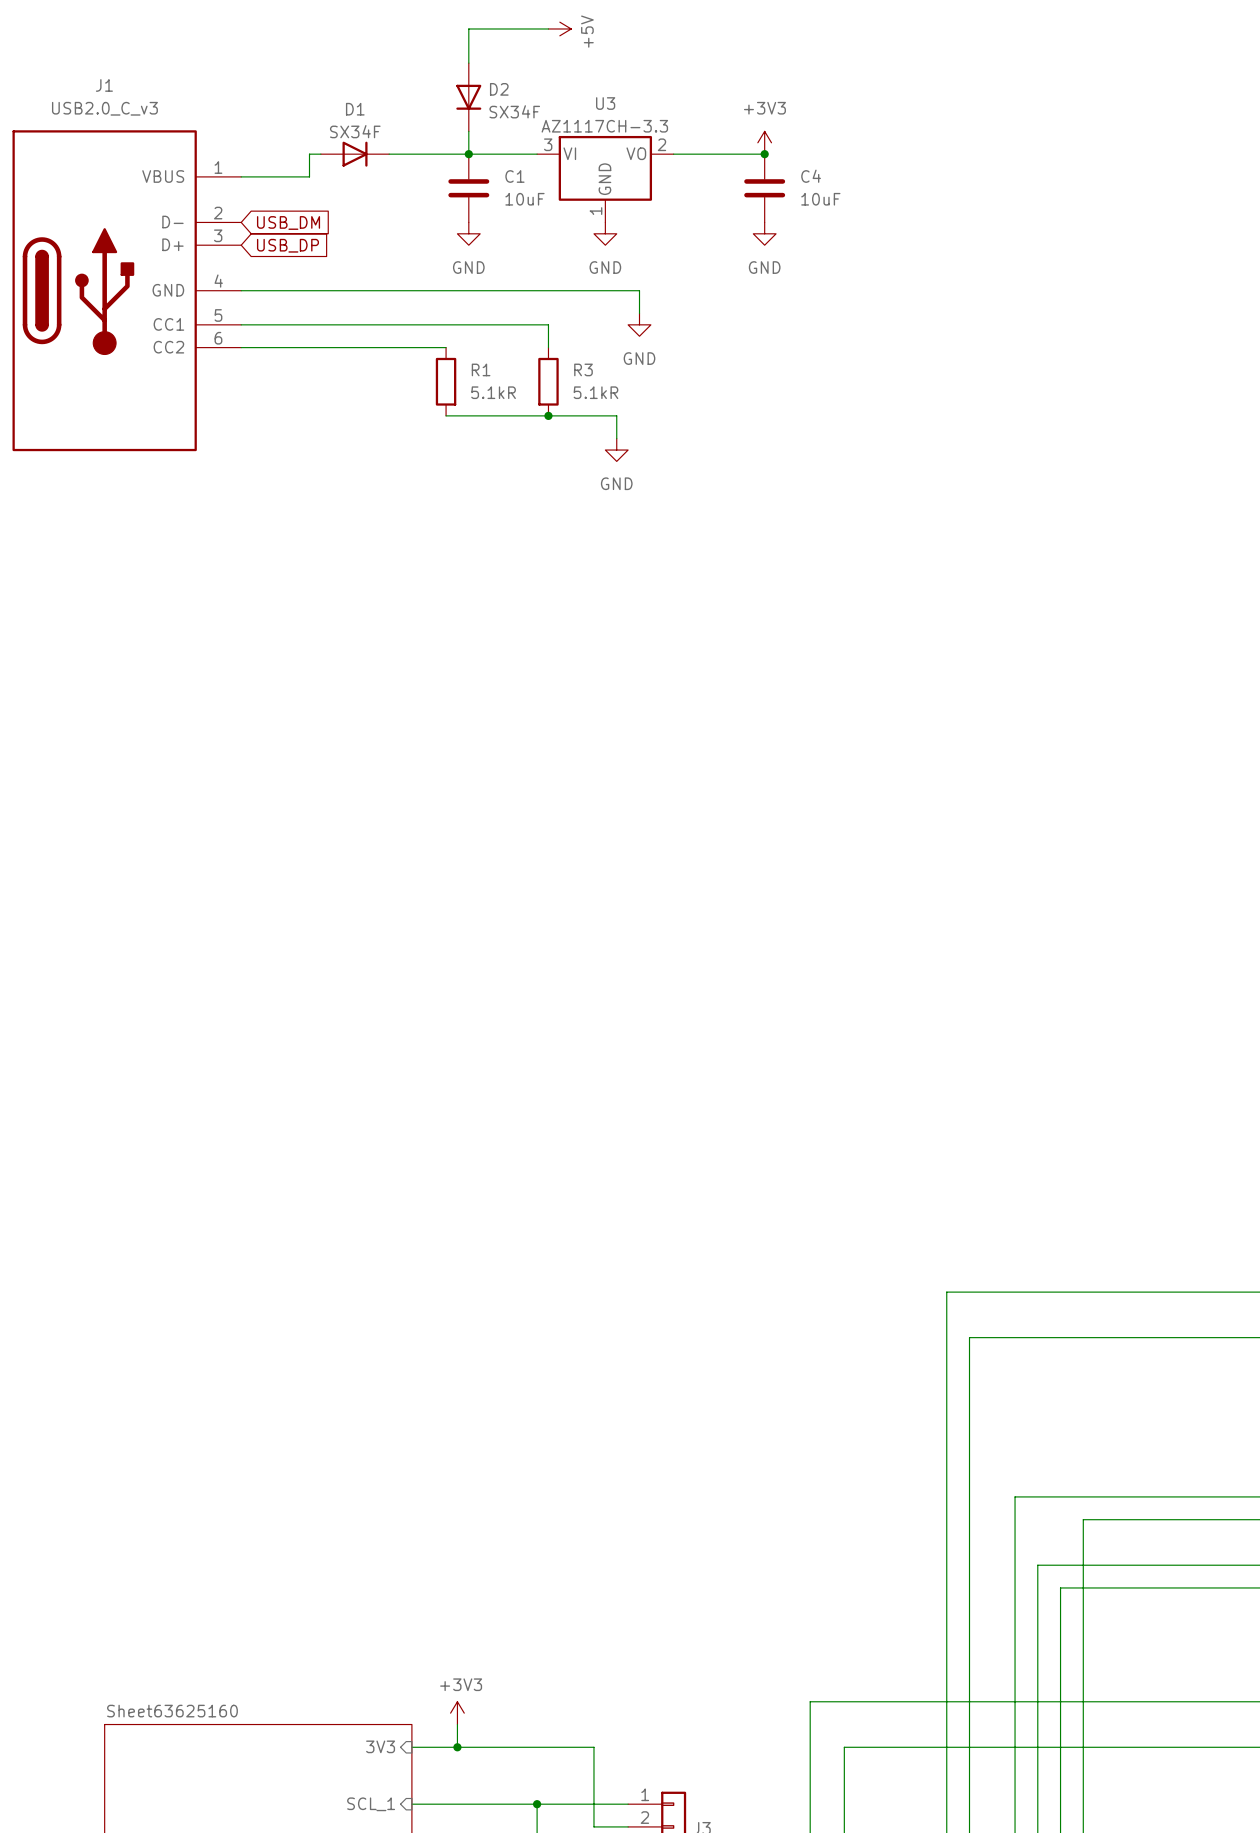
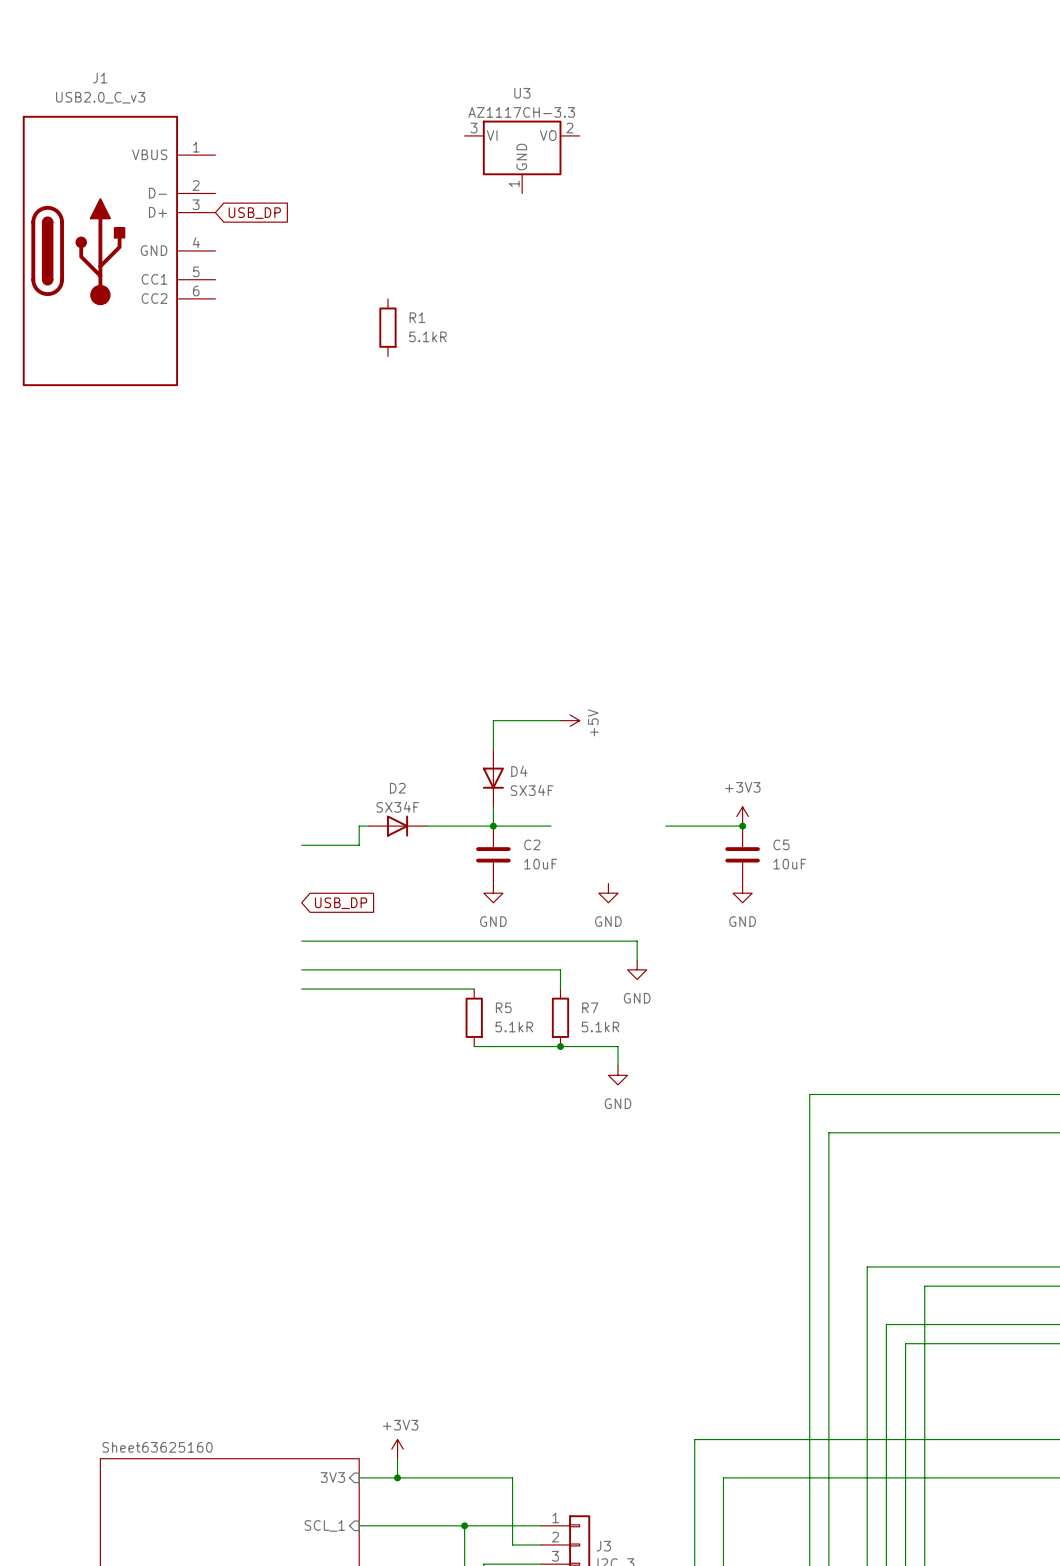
wire: (548, 28) (468, 28) (468, 63) -> none
power symbol: +5V (559, 28) -> none
D2 rotation: 0° (468, 97) -> 90° counterclockwise (397, 826)
D2 position: (468, 97) -> (397, 826)
D2 value position: SX34F (514, 111) -> SX34F (397, 807)
wire: (468, 131) (468, 154) -> none
power symbol: +3V3 (764, 142) -> none
wire: (320, 154) (309, 154) (309, 176) (241, 176) -> none
D1: SX34F (355, 154) -> none
wire: (389, 154) (537, 154) -> none
junction: (468, 154) -> none
wire: (673, 154) (764, 154) -> none
junction: (764, 154) -> none
C1: 10uF (468, 188) -> none
C4: 10uF (764, 188) -> none
global label: USB_DM (288, 222) -> none
power symbol: GND (468, 233) -> none
power symbol: GND (605, 233) -> none
power symbol: GND (764, 233) -> none
wire: (241, 290) (639, 290) (639, 313) -> none
wire: (241, 324) (548, 324) (548, 347) -> none
power symbol: GND (639, 324) -> none
wire: (241, 347) (446, 347) -> none
R3: 5.1kR (548, 381) -> none
wire: (446, 415) (616, 415) (616, 438) -> none
junction: (548, 415) -> none
power symbol: GND (616, 450) -> none
wire: none -> (560, 720) (493, 720) (493, 749)
power symbol: none -> +5V (570, 720)
D4: none -> SX34F (493, 778)
wire: none -> (493, 806) (493, 826)
power symbol: none -> +3V3 (742, 816)
wire: none -> (368, 826) (359, 826) (359, 845) (301, 845)
wire: none -> (426, 826) (550, 826)
junction: none -> (493, 826)
wire: none -> (665, 826) (742, 826)
junction: none -> (742, 826)
C2: none -> 10uF (493, 854)
C5: none -> 10uF (742, 854)
power symbol: none -> GND (493, 893)
power symbol: none -> GND (608, 893)
power symbol: none -> GND (742, 893)
global label: none -> USB_DP (341, 903)
wire: none -> (301, 941) (637, 941) (637, 960)
wire: none -> (301, 969) (560, 969) (560, 989)
power symbol: none -> GND (637, 969)
wire: none -> (301, 989) (474, 989)
R5: none -> 5.1kR (474, 1017)
R7: none -> 5.1kR (560, 1017)
wire: none -> (474, 1046) (618, 1046) (618, 1065)
junction: none -> (560, 1046)
power symbol: none -> GND (618, 1075)

